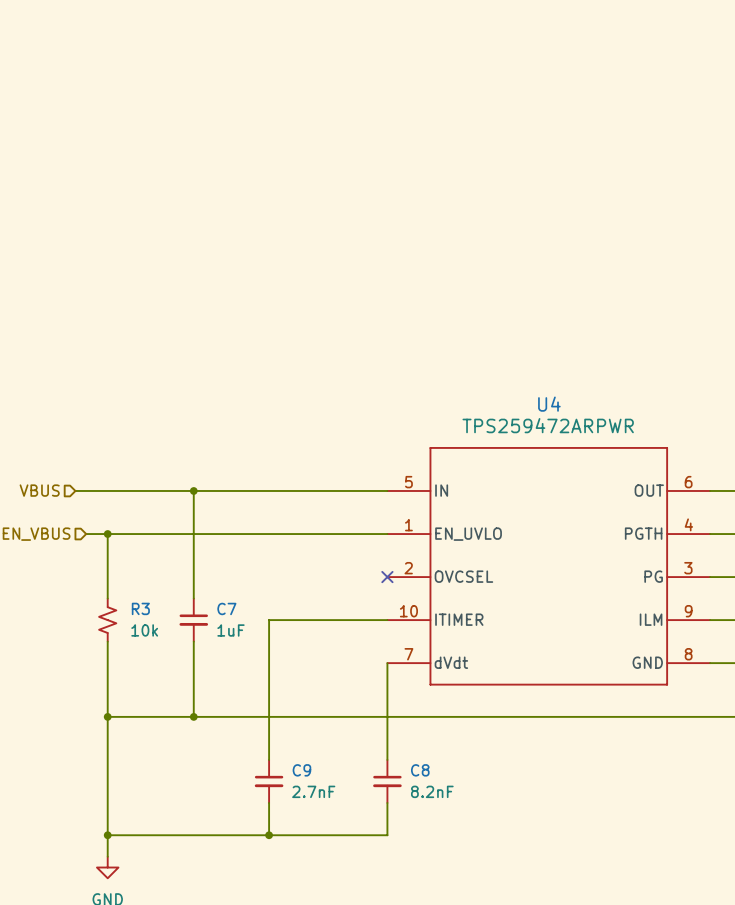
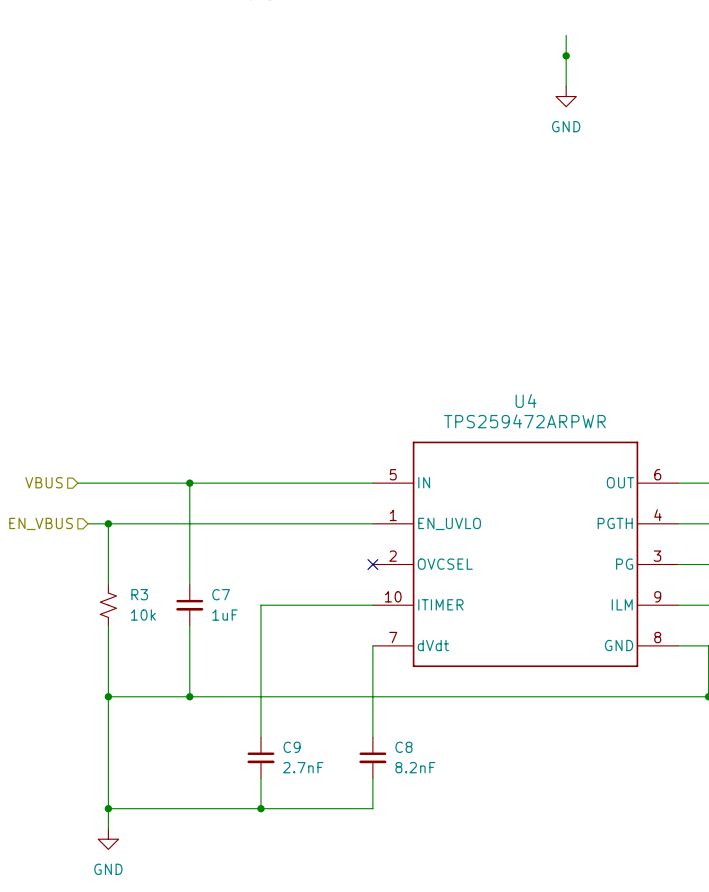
wire: none -> (566, 35) (566, 86)
junction: none -> (566, 55)
power symbol: none -> GND (566, 96)

